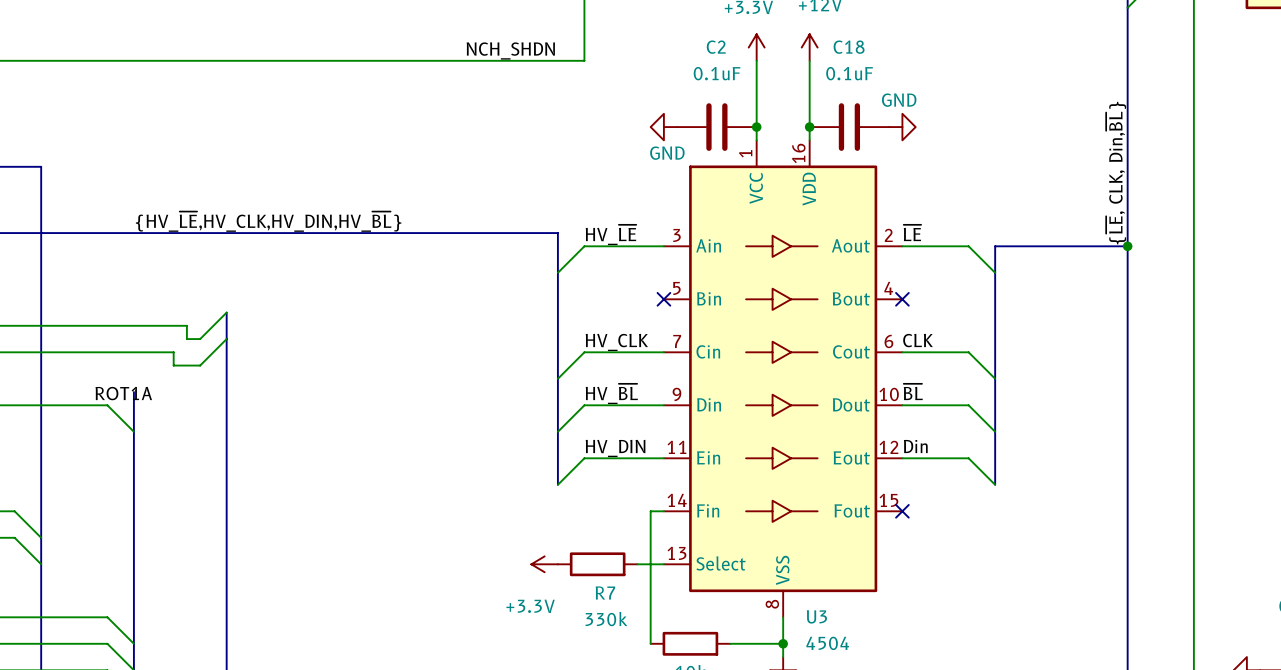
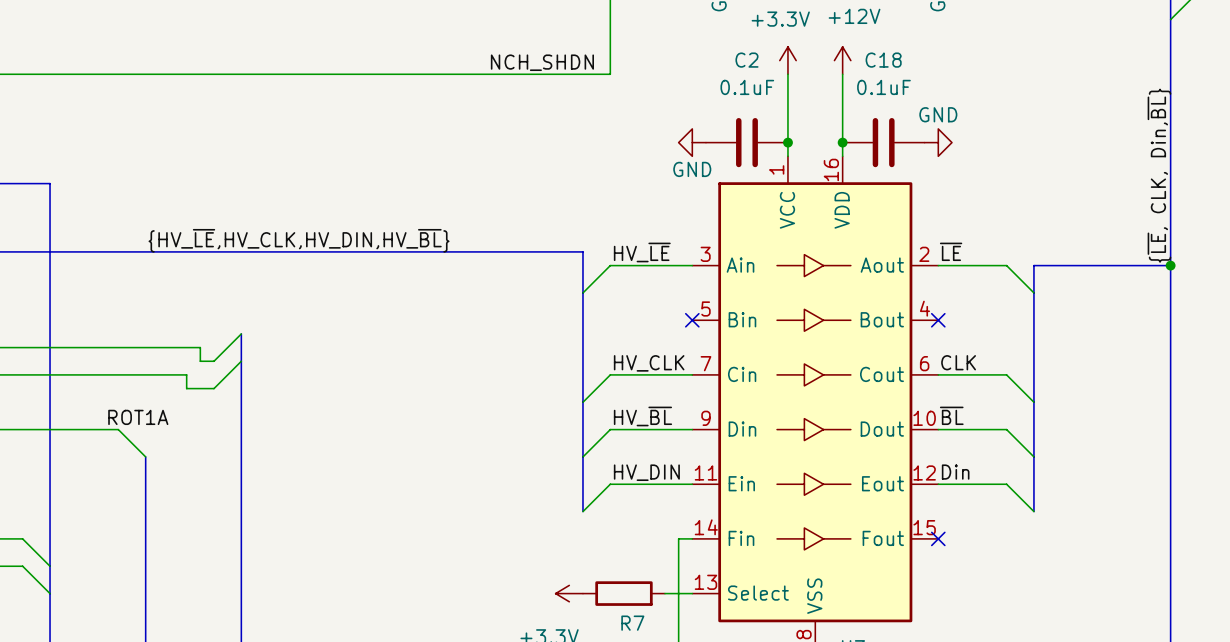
bus: (133, 392) (133, 431) -> none

